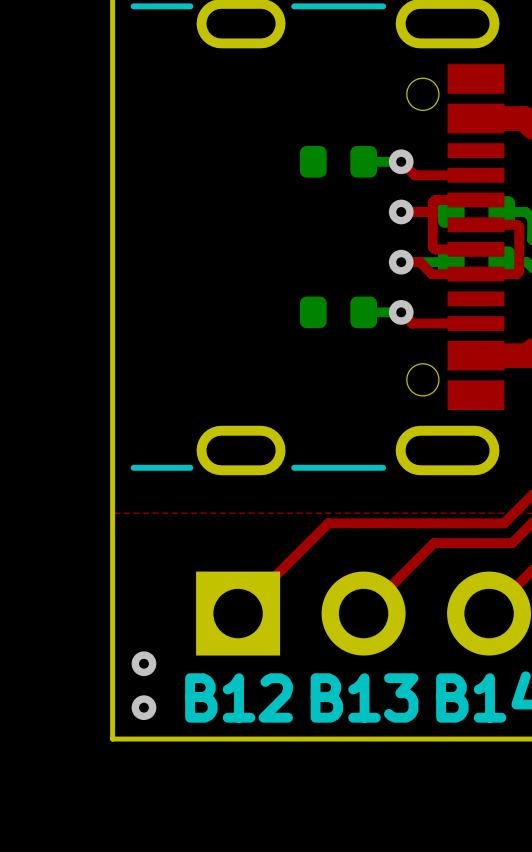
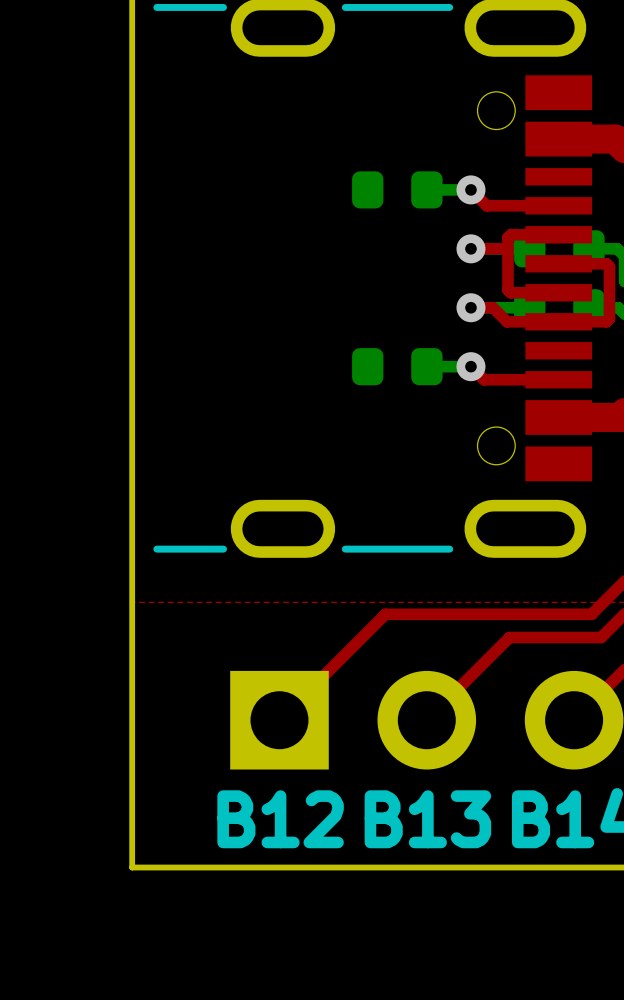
via: (143, 663) -> none
via: (143, 707) -> none

